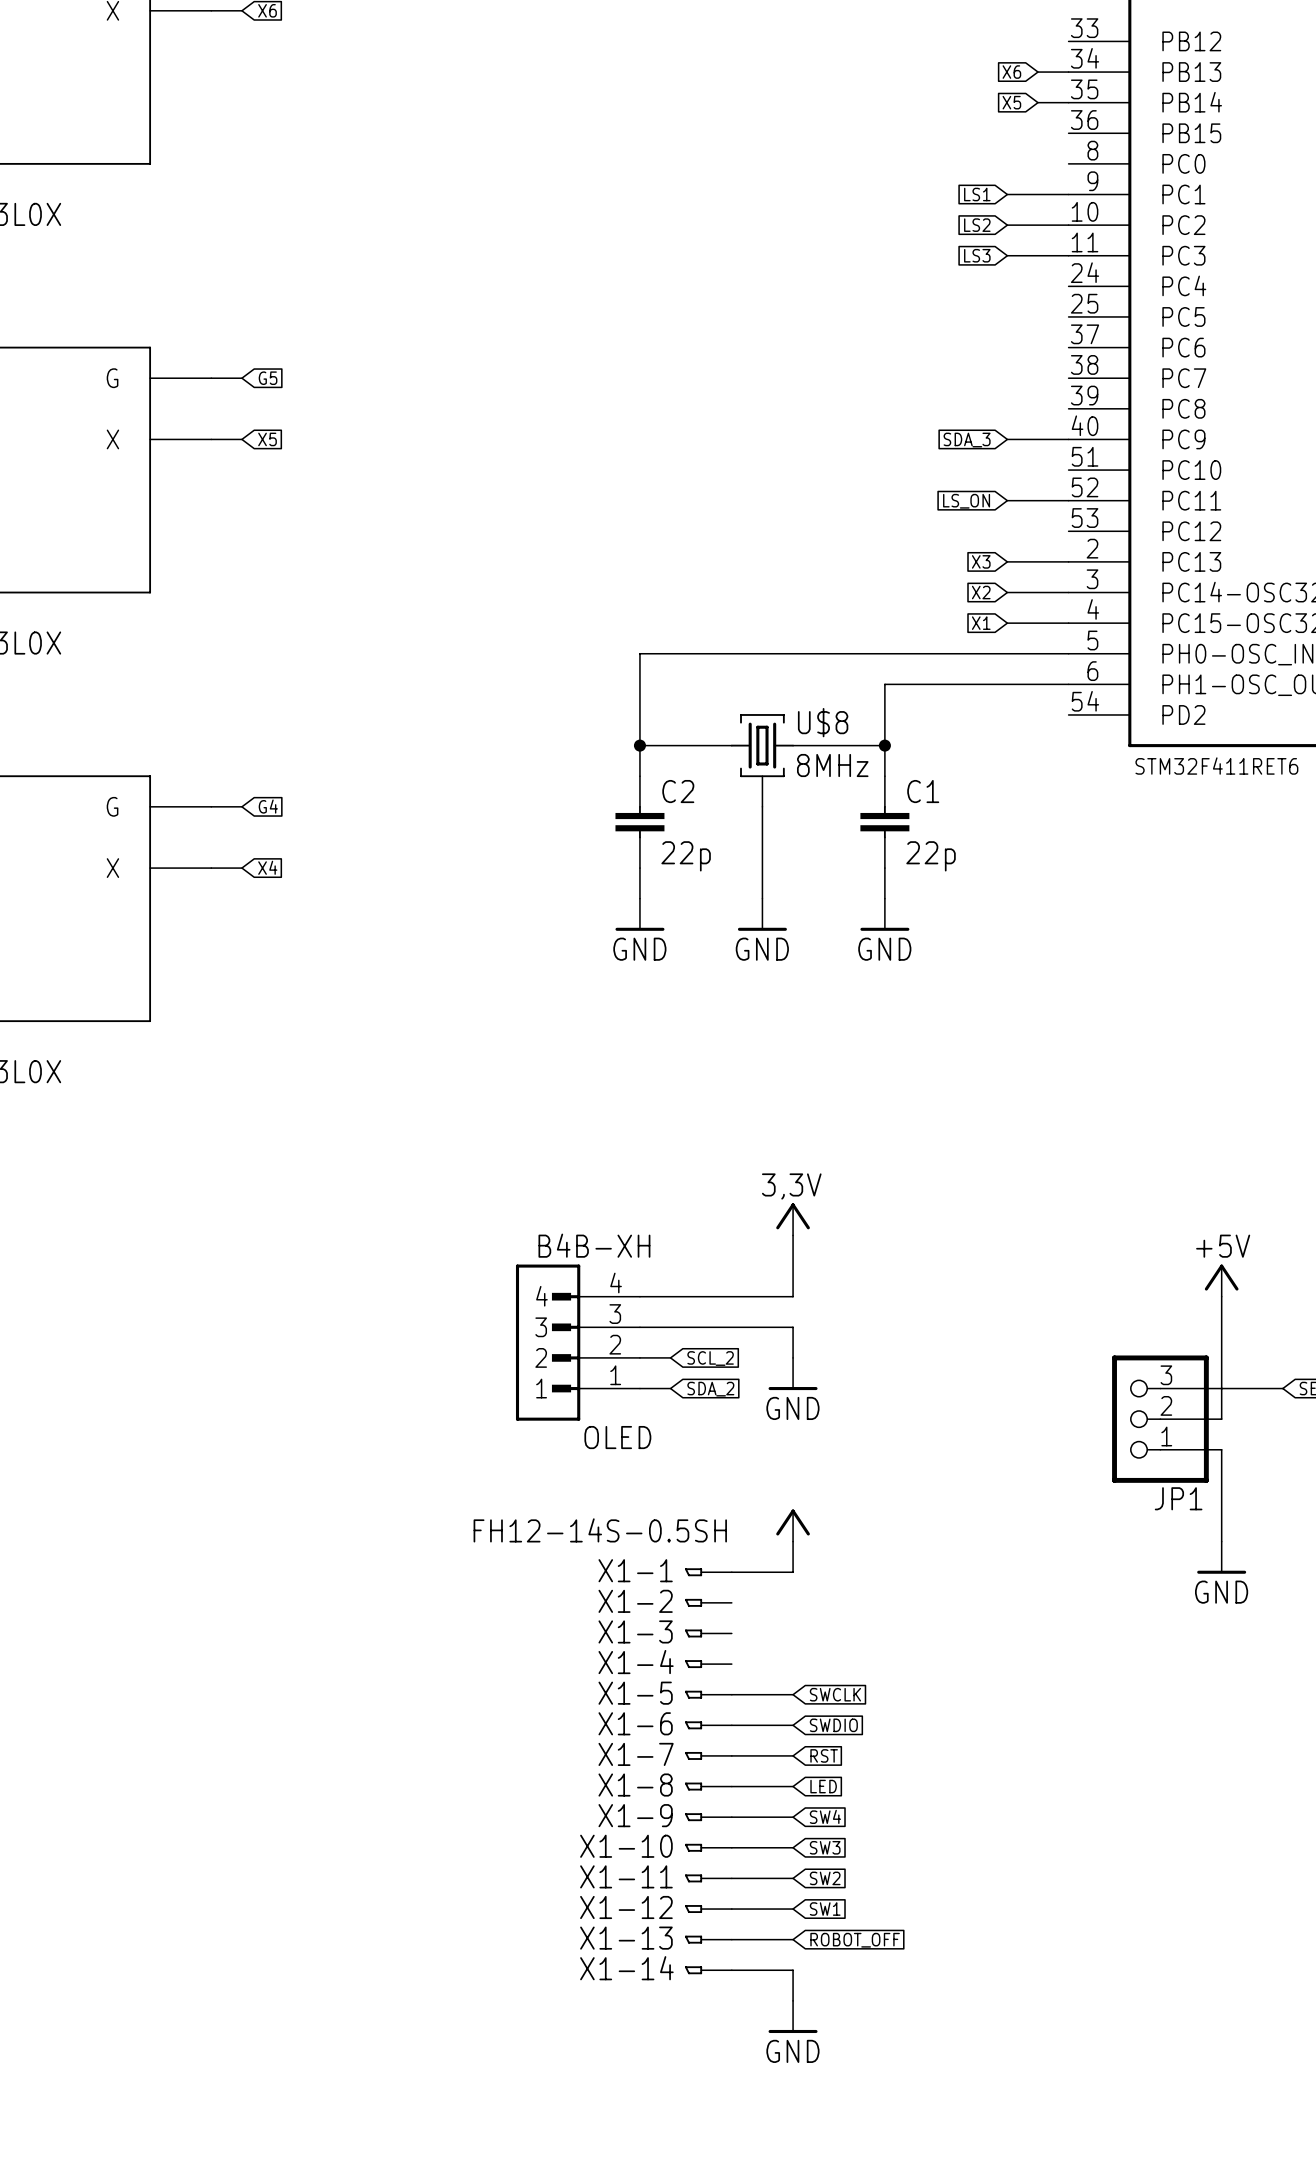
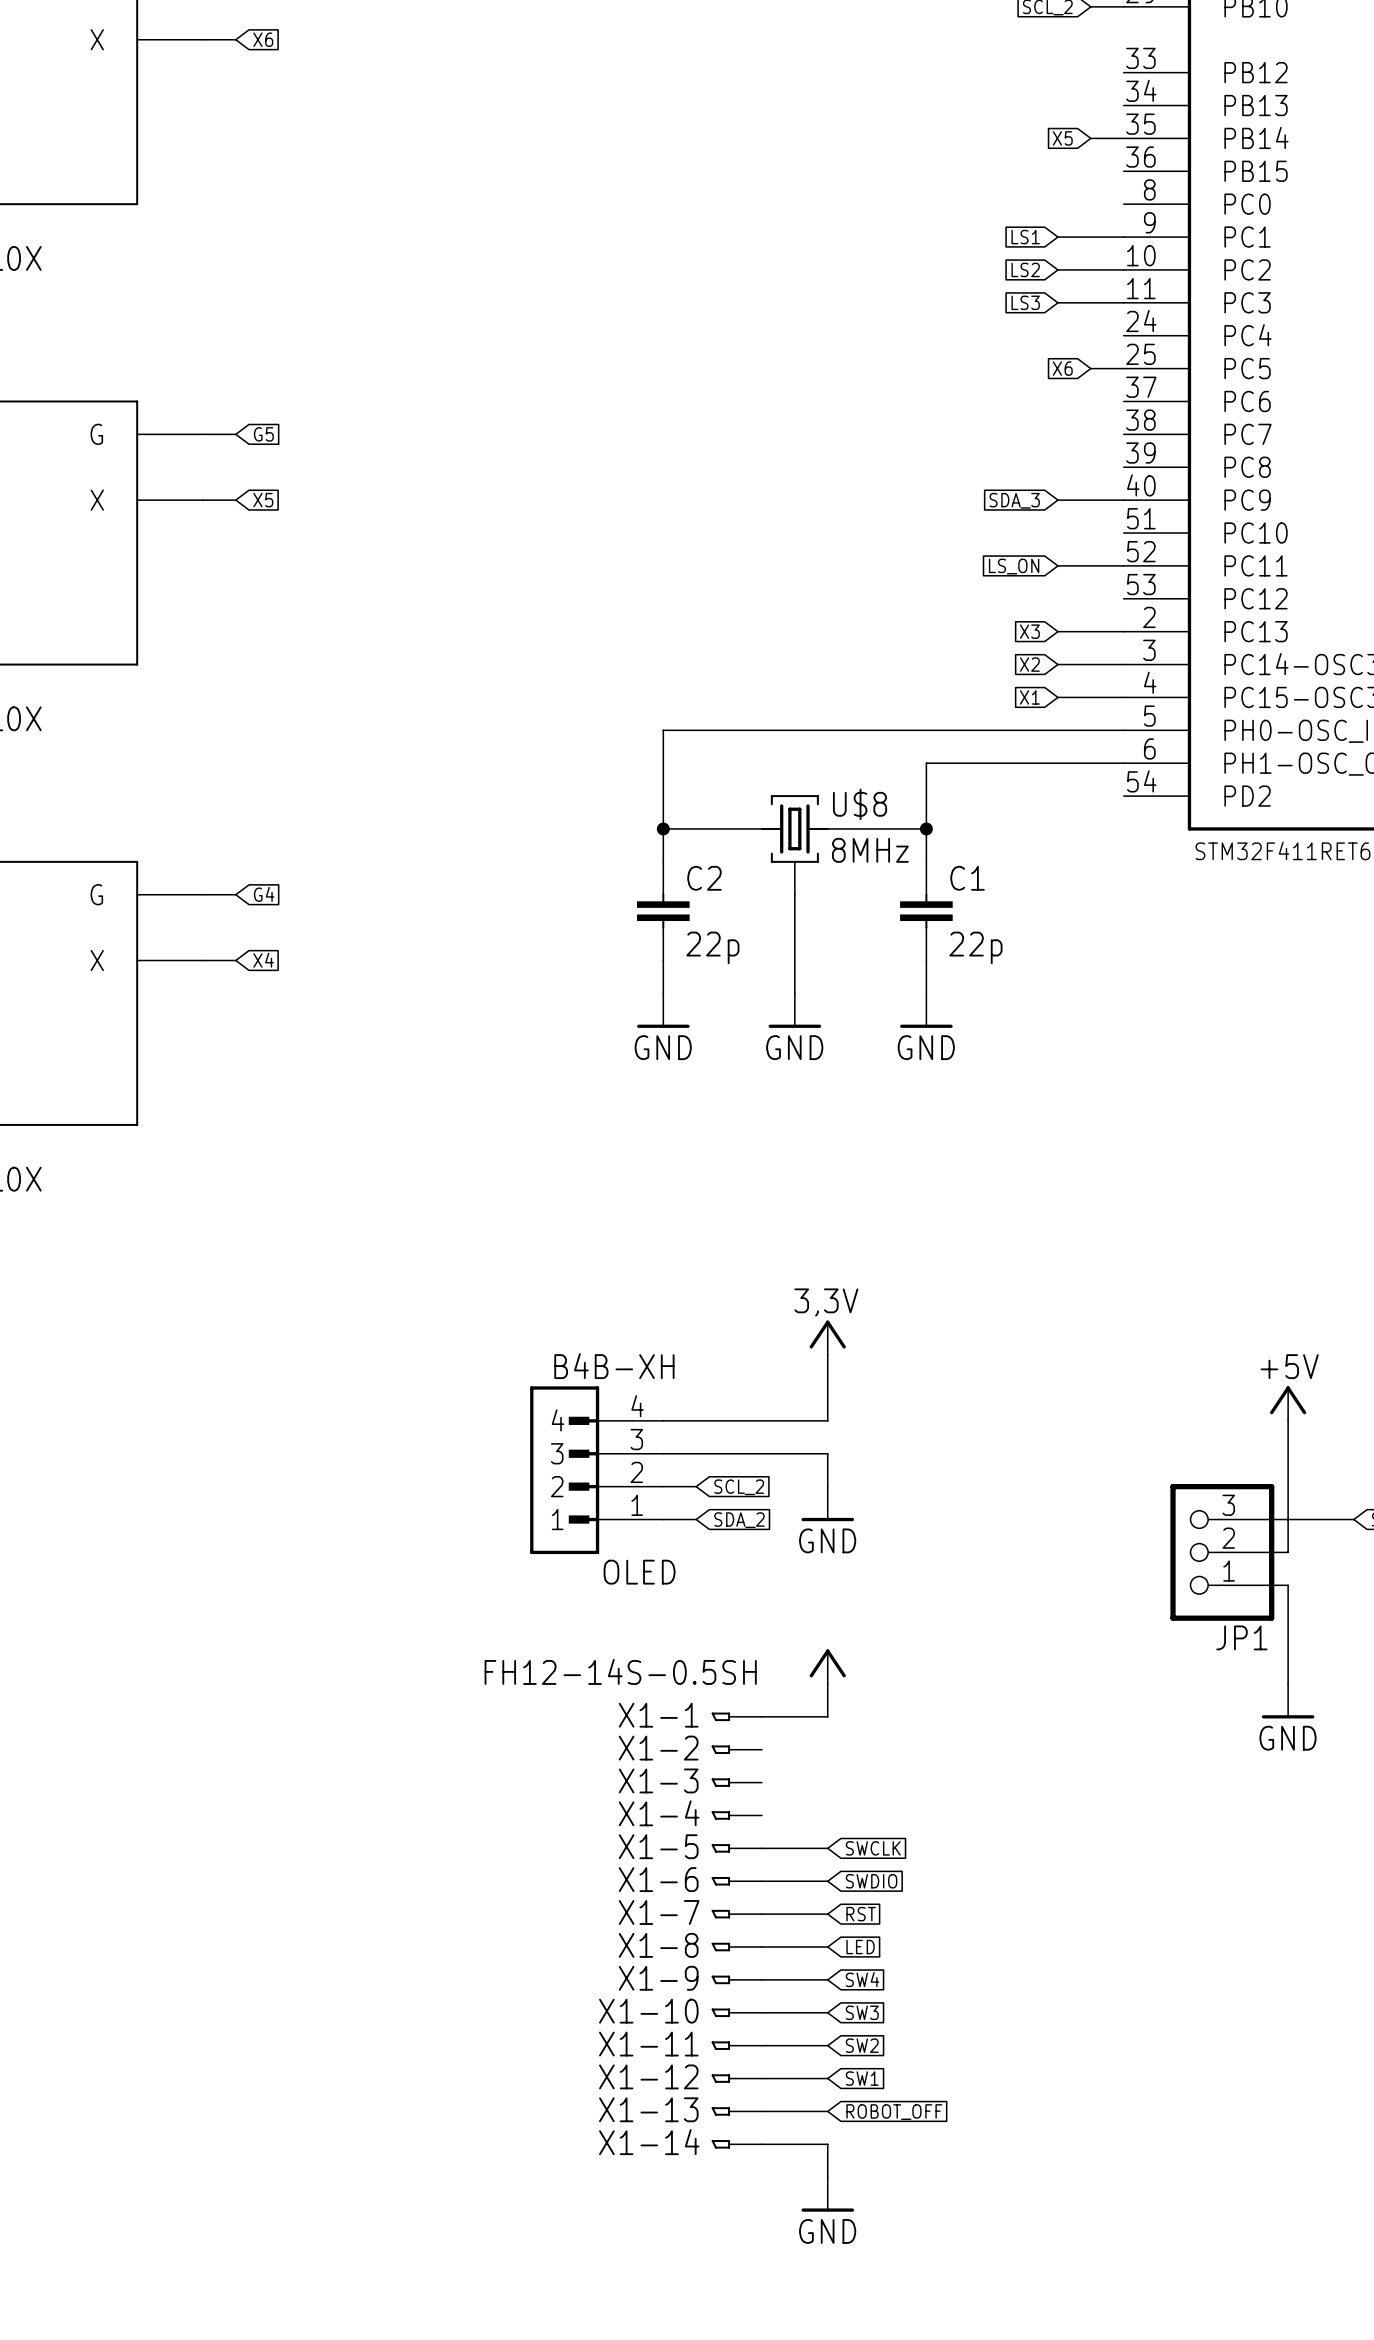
global label position: X6 (1011, 72) -> X6 (1062, 368)
wire: (1037, 72) (1068, 72) -> (1090, 368) (1123, 368)

